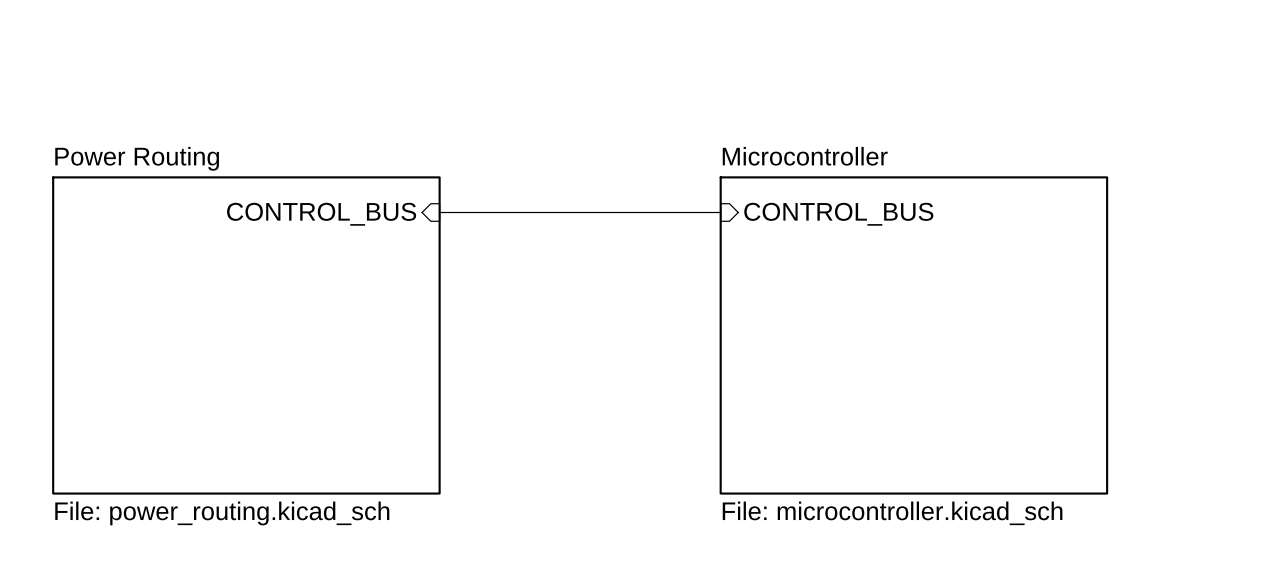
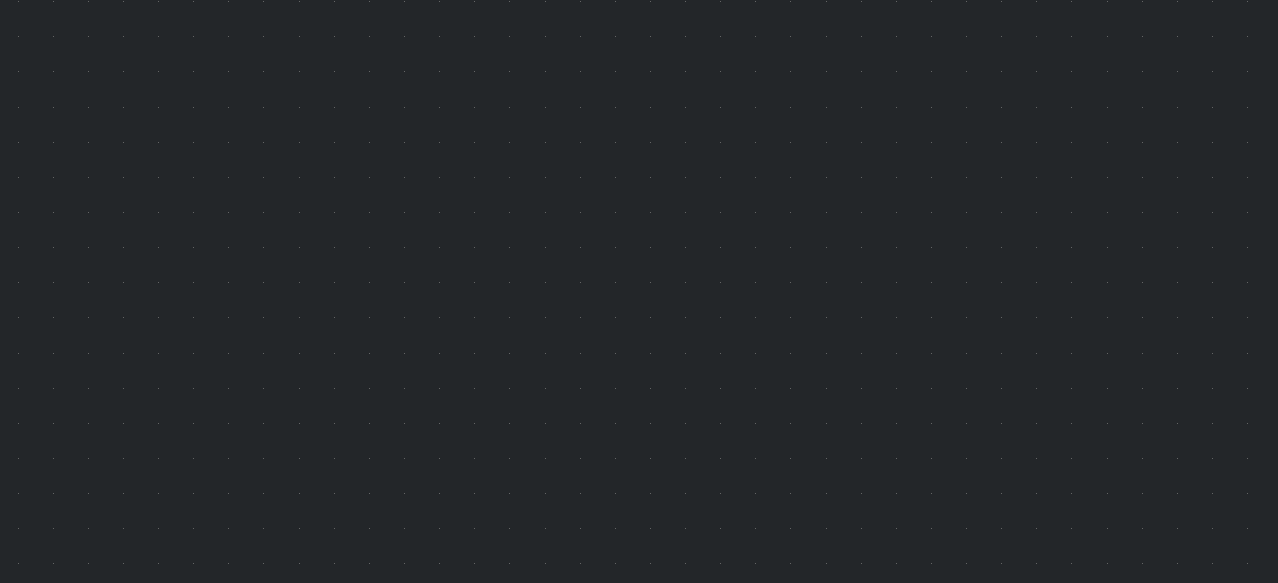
bus: (439, 212) (720, 212) -> none
sheet pin: CONTROL_BUS (321, 214) -> none
sheet pin: CONTROL_BUS (838, 214) -> none
sheet Power Routing: File: power_routing.kicad_sch (246, 335) -> none
sheet Microcontroller: File: microcontroller.kicad_sch (913, 335) -> none

